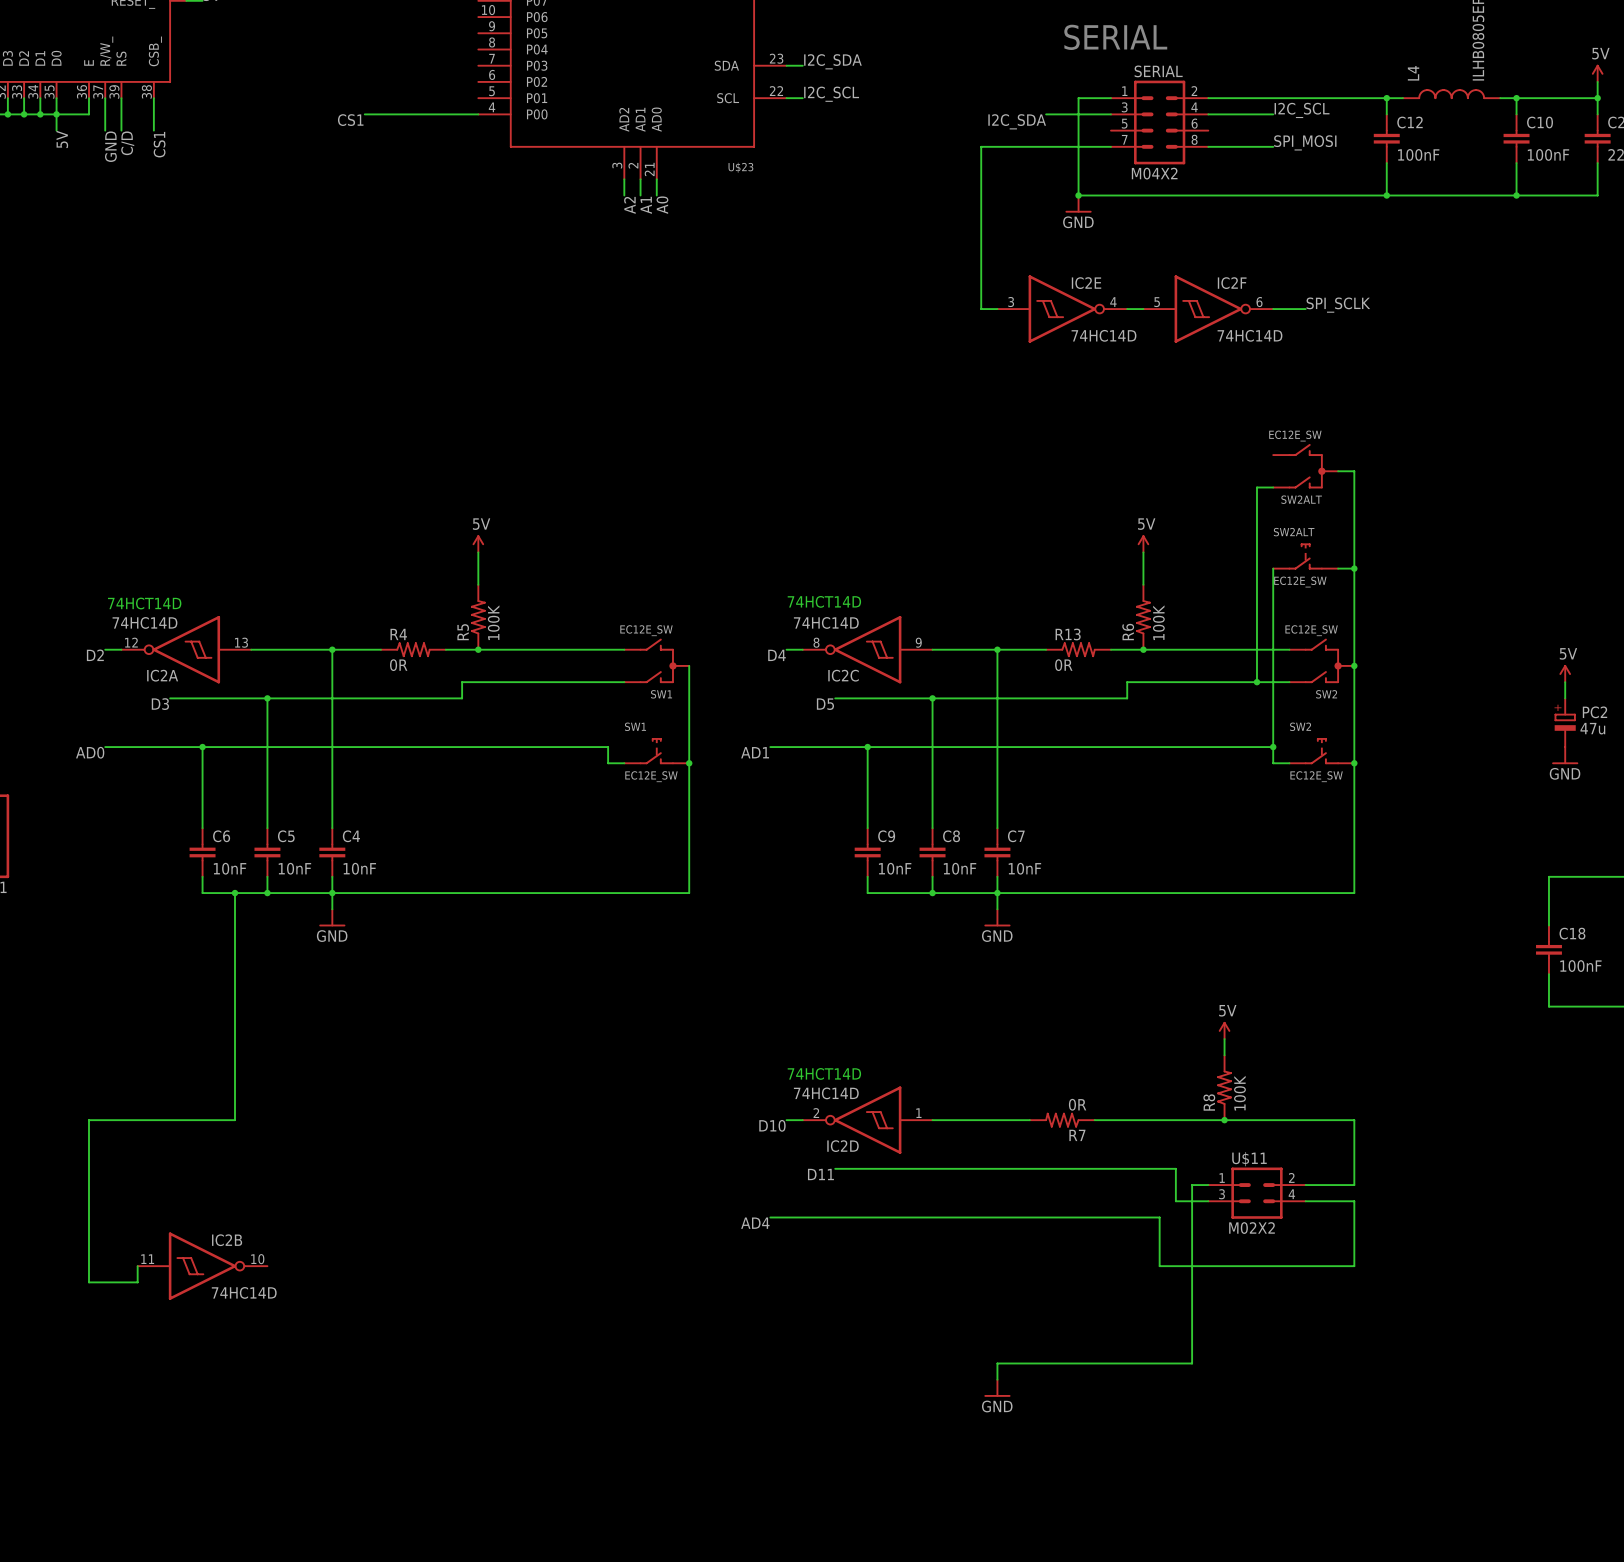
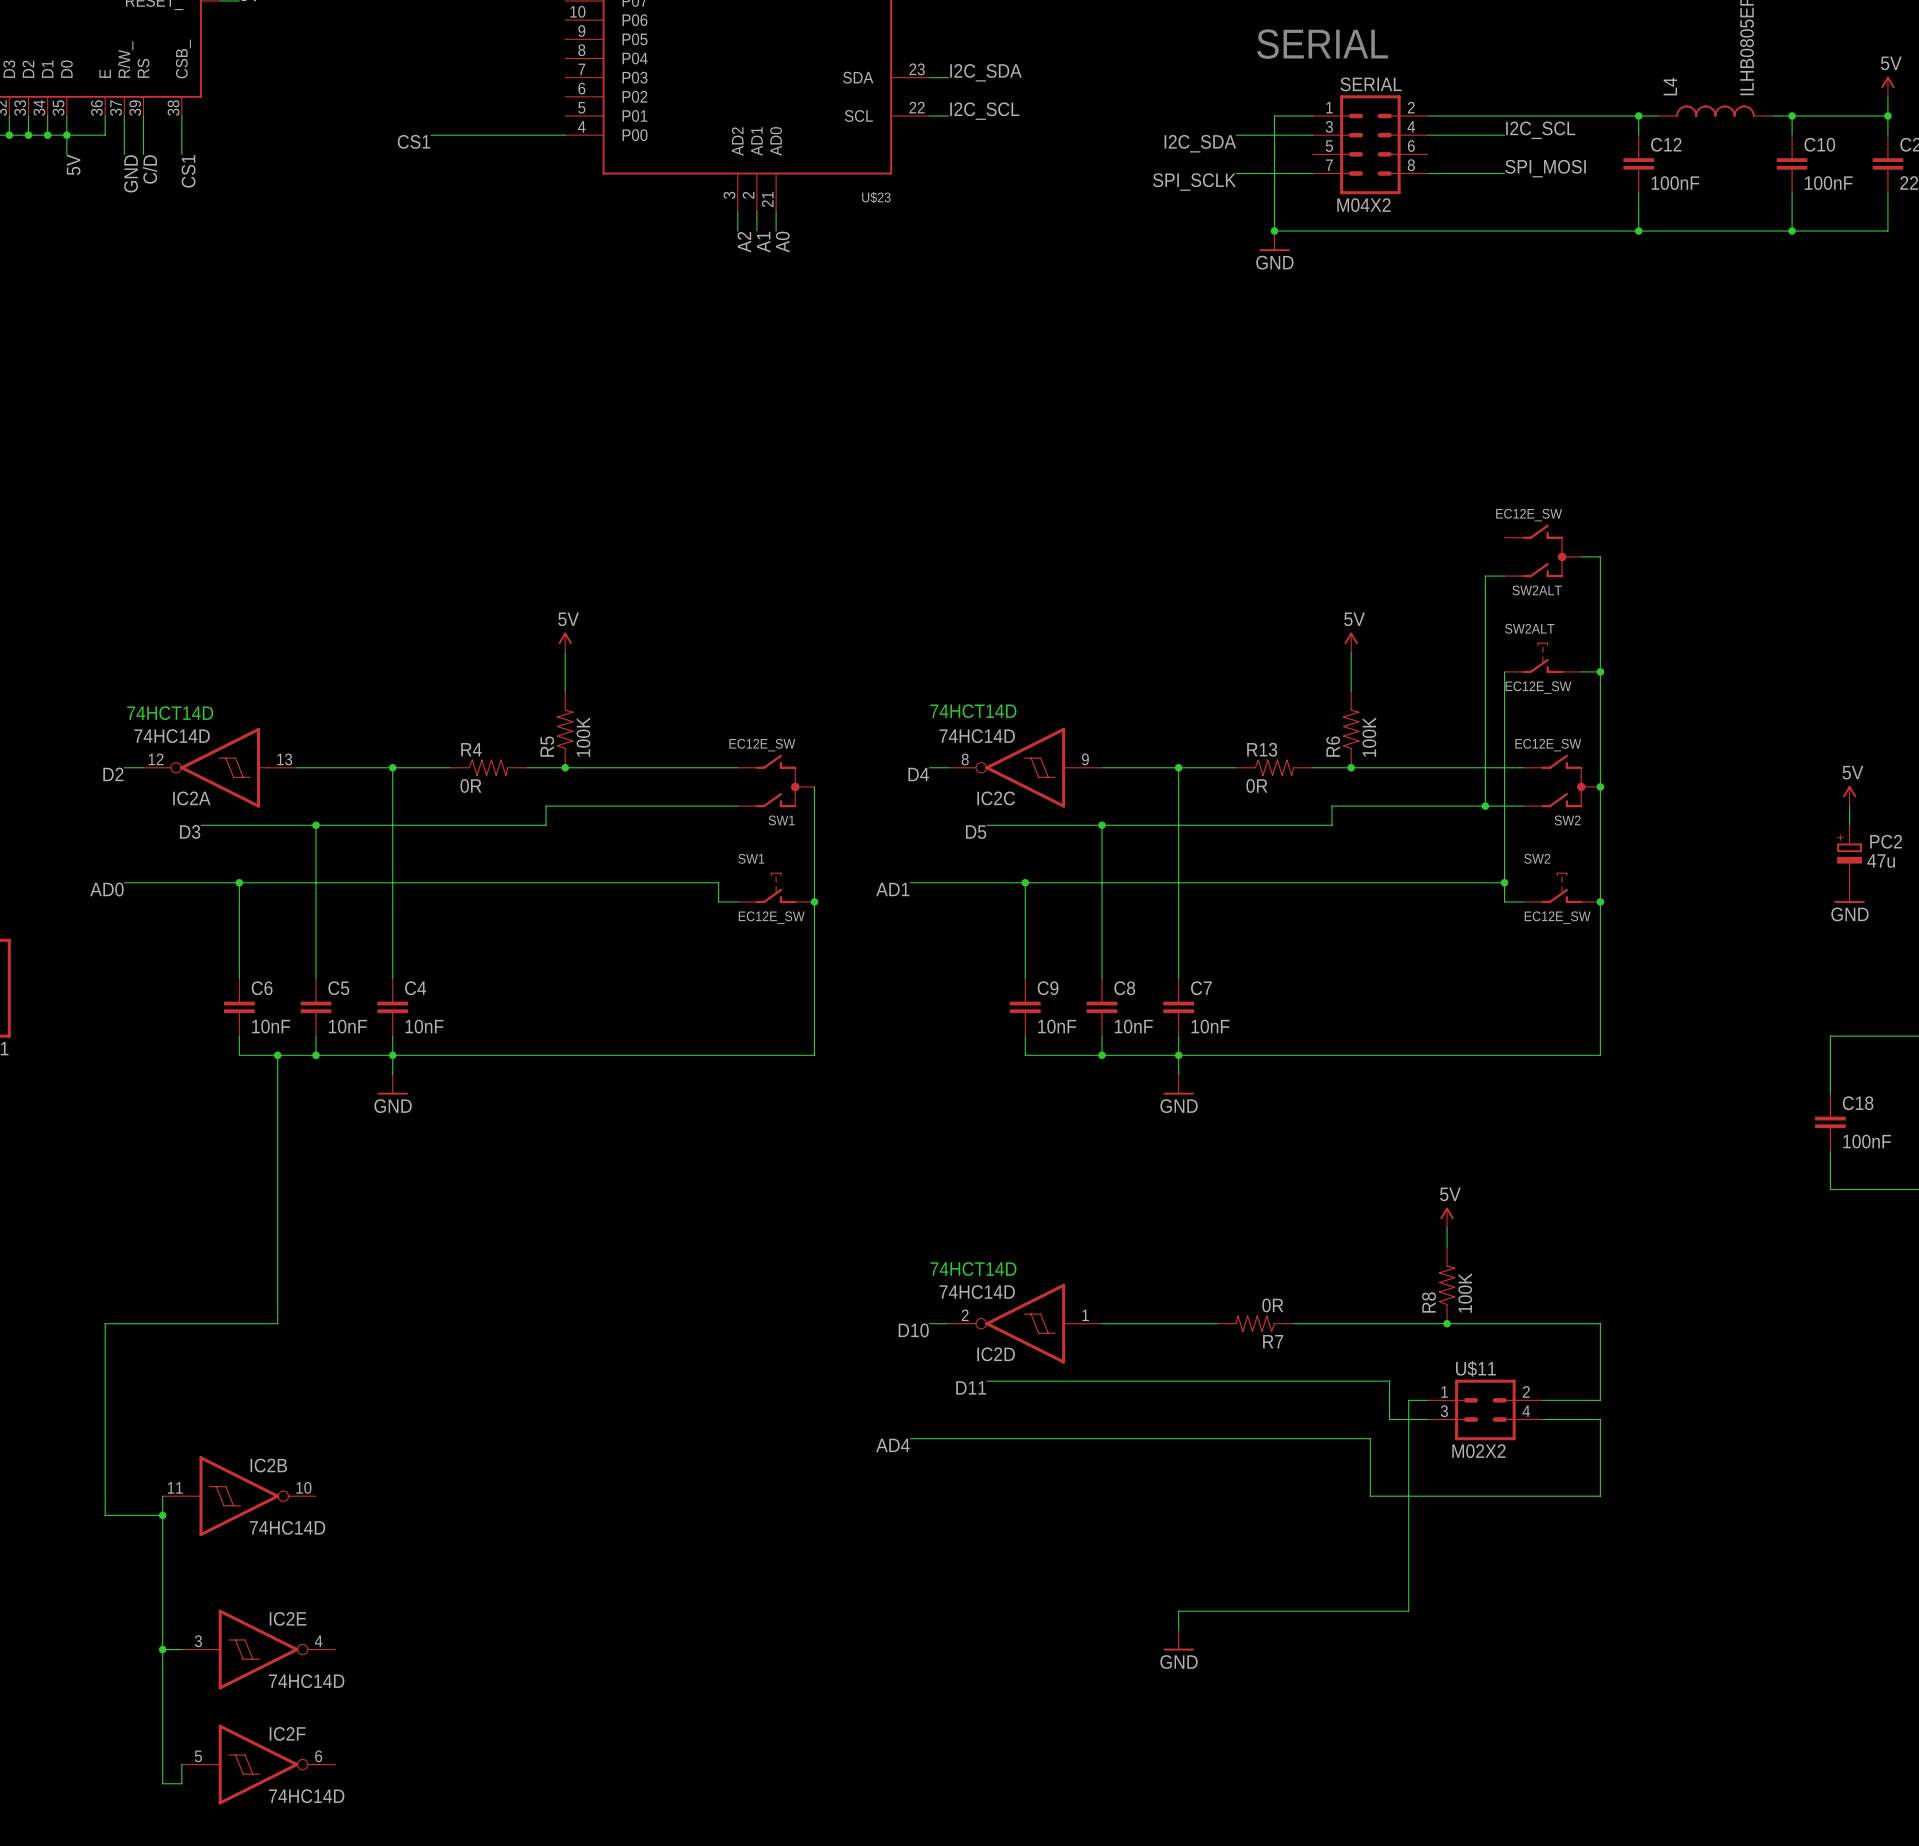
wire: (1046, 146) (981, 146) (981, 309) (997, 309) -> none
label: none -> SPI_SCLK (1194, 182)
label: SPI_SCLK (1338, 305) -> none
IC2E position: (1062, 309) -> (258, 1649)
wire: (1127, 309) (1143, 309) -> none
IC2F position: (1208, 309) -> (258, 1764)
wire: (1273, 309) (1305, 309) -> none
wire: none -> (162, 1515) (162, 1783) (181, 1783) (181, 1764)
junction: none -> (162, 1515)
wire: none -> (162, 1649) (181, 1649)
junction: none -> (162, 1649)

